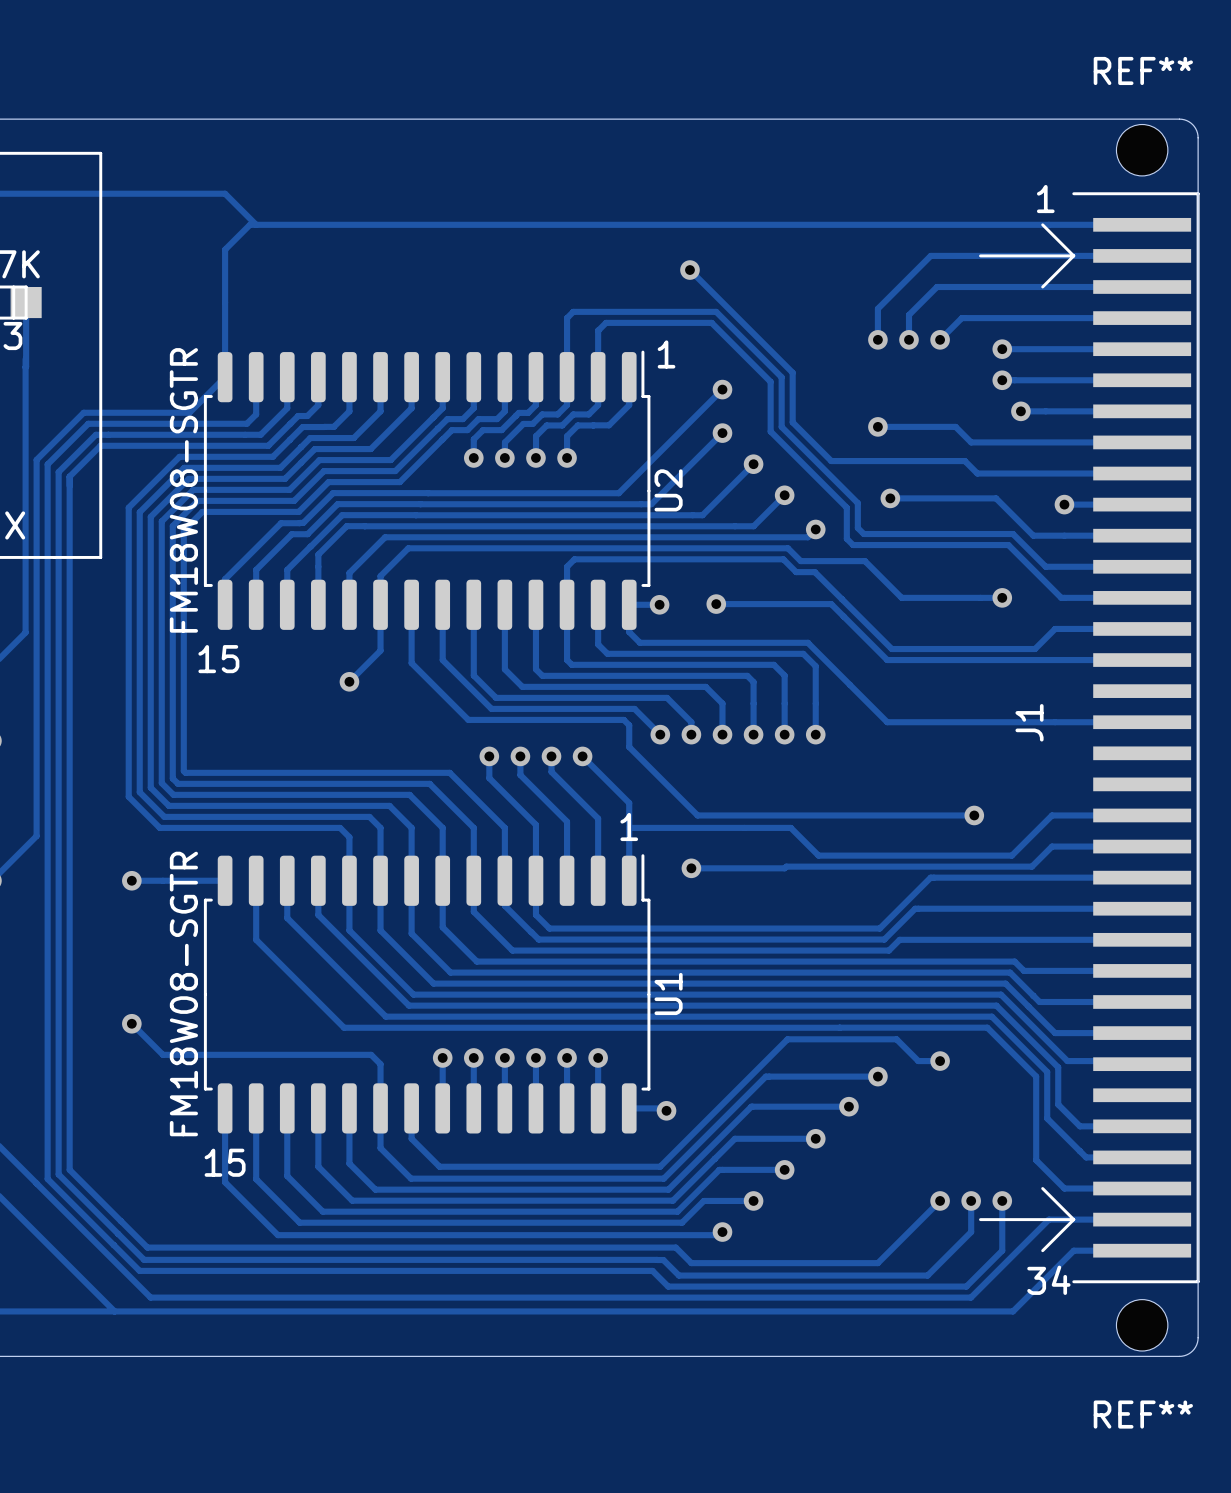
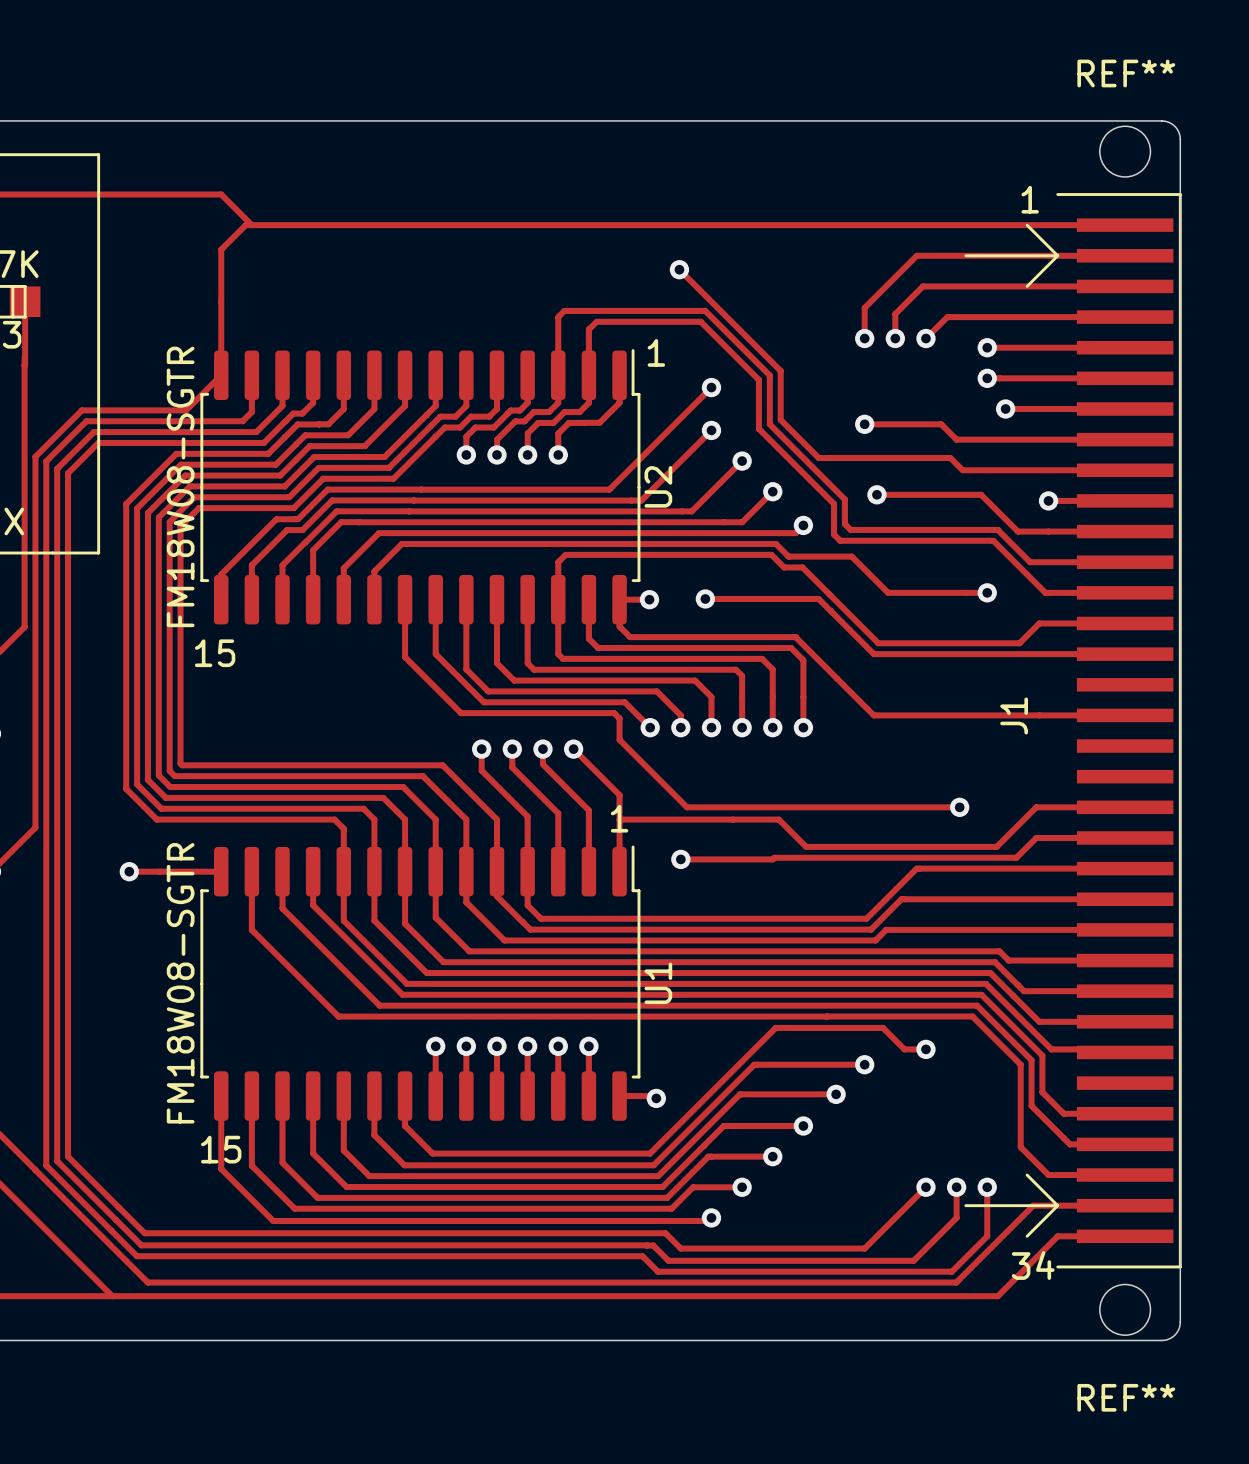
track: (380, 604) (380, 650) (349, 681) -> none
via: (349, 681) -> none
track: (131, 1023) (162, 1054) (371, 1054) (380, 1064) (380, 1108) -> none
via: (131, 1023) -> none

